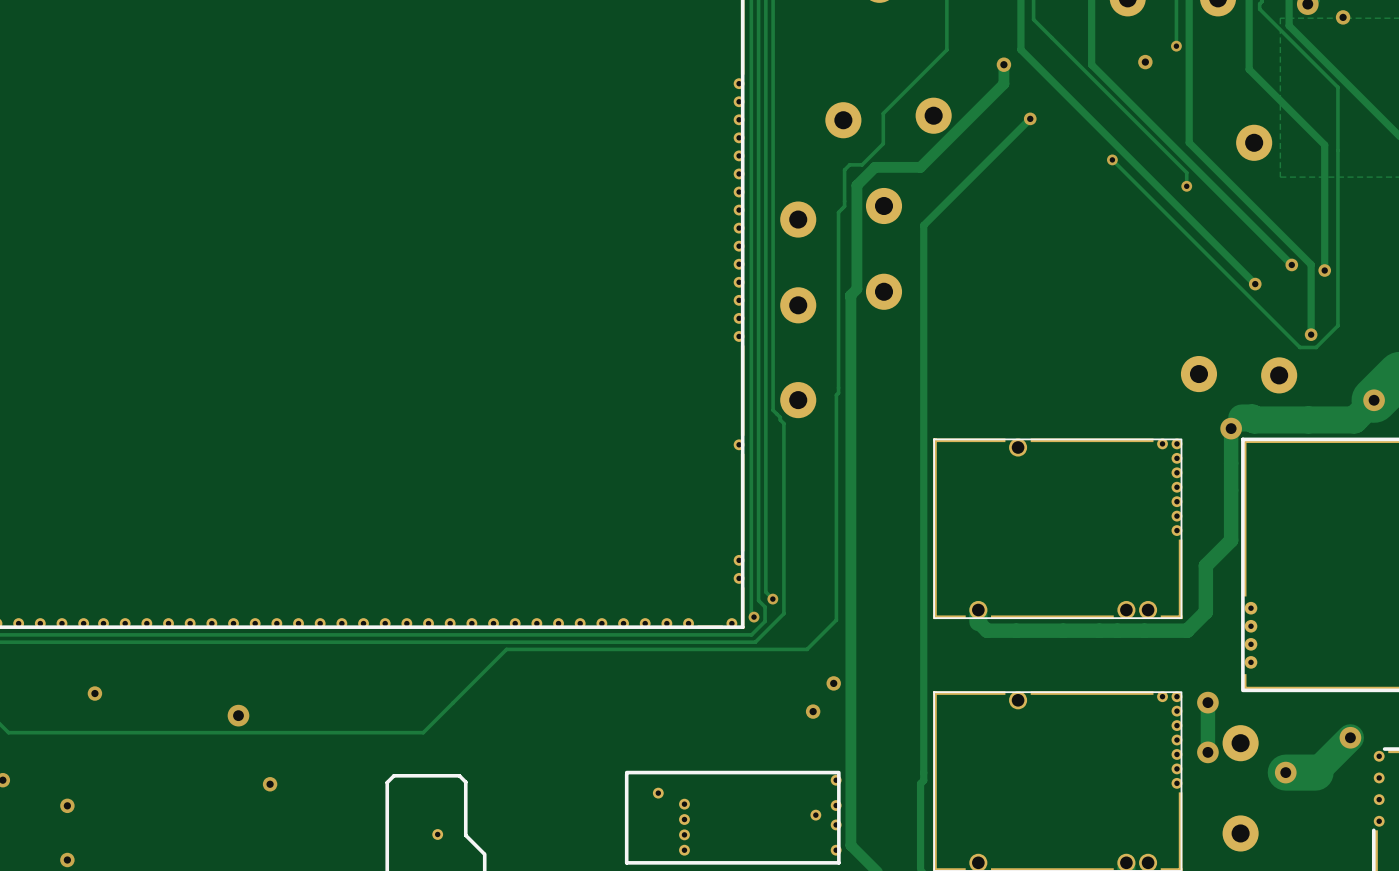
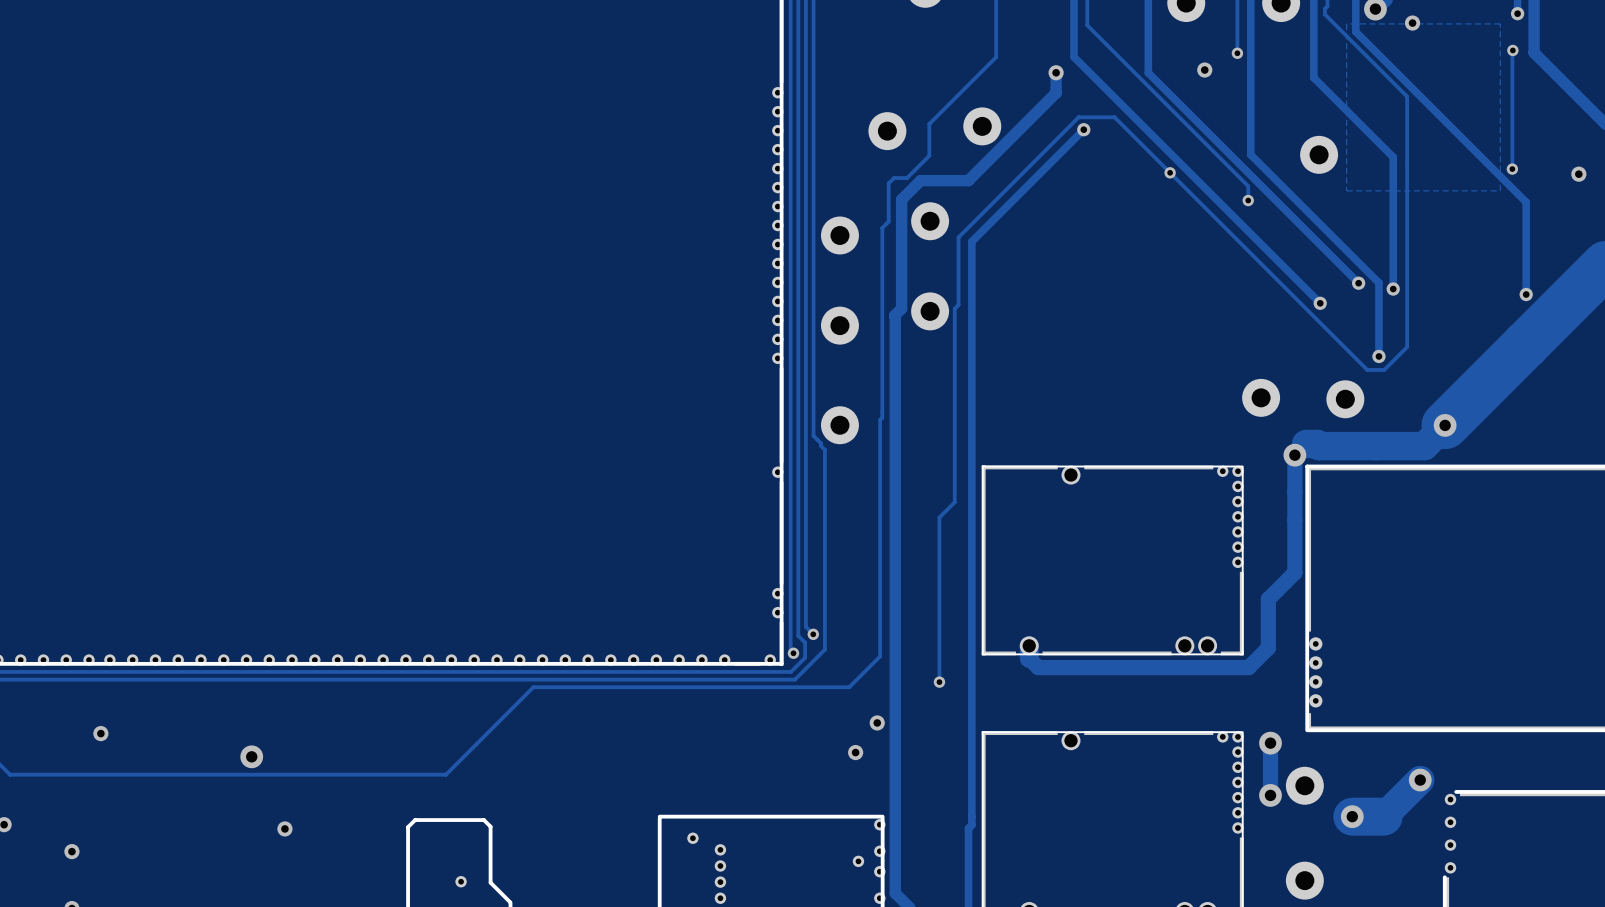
track: none -> (1170, 172) (1114, 117) (1078, 117) (958, 237) (958, 304) (954, 308) (954, 502) (939, 517) (939, 682)
via: none -> (939, 682)

